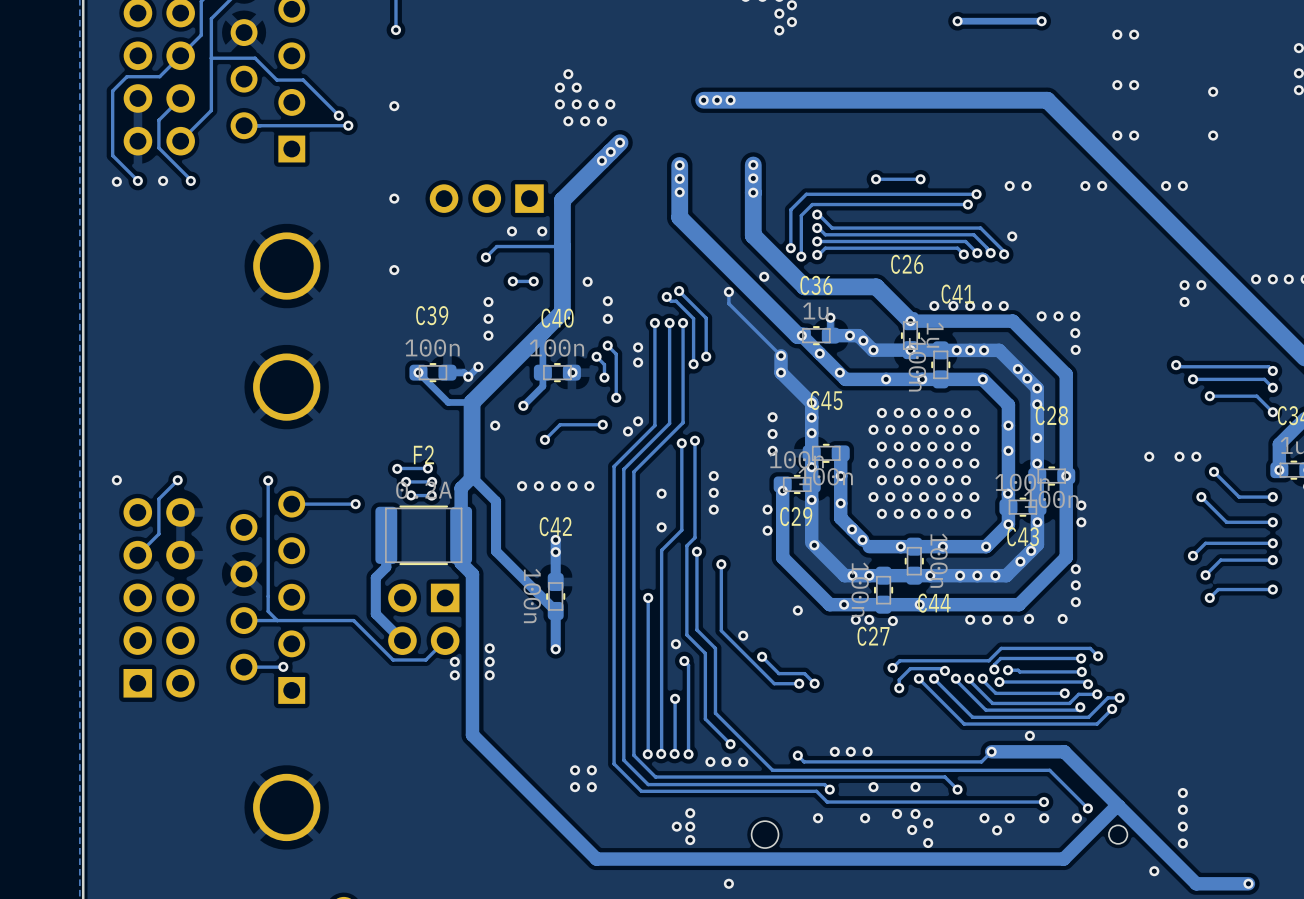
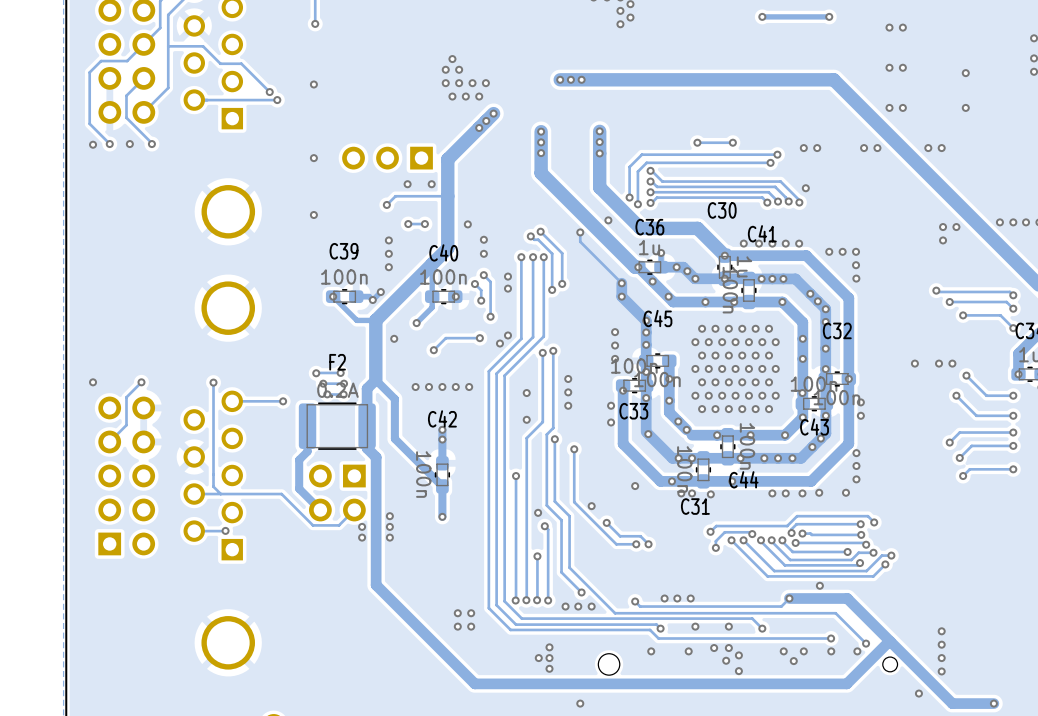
C26 name: C26 (907, 264) -> C30 (722, 210)
C28 name: C28 (1051, 415) -> C32 (837, 330)
C29 name: C29 (796, 516) -> C33 (633, 411)
C27 name: C27 (873, 636) -> C31 (695, 506)

